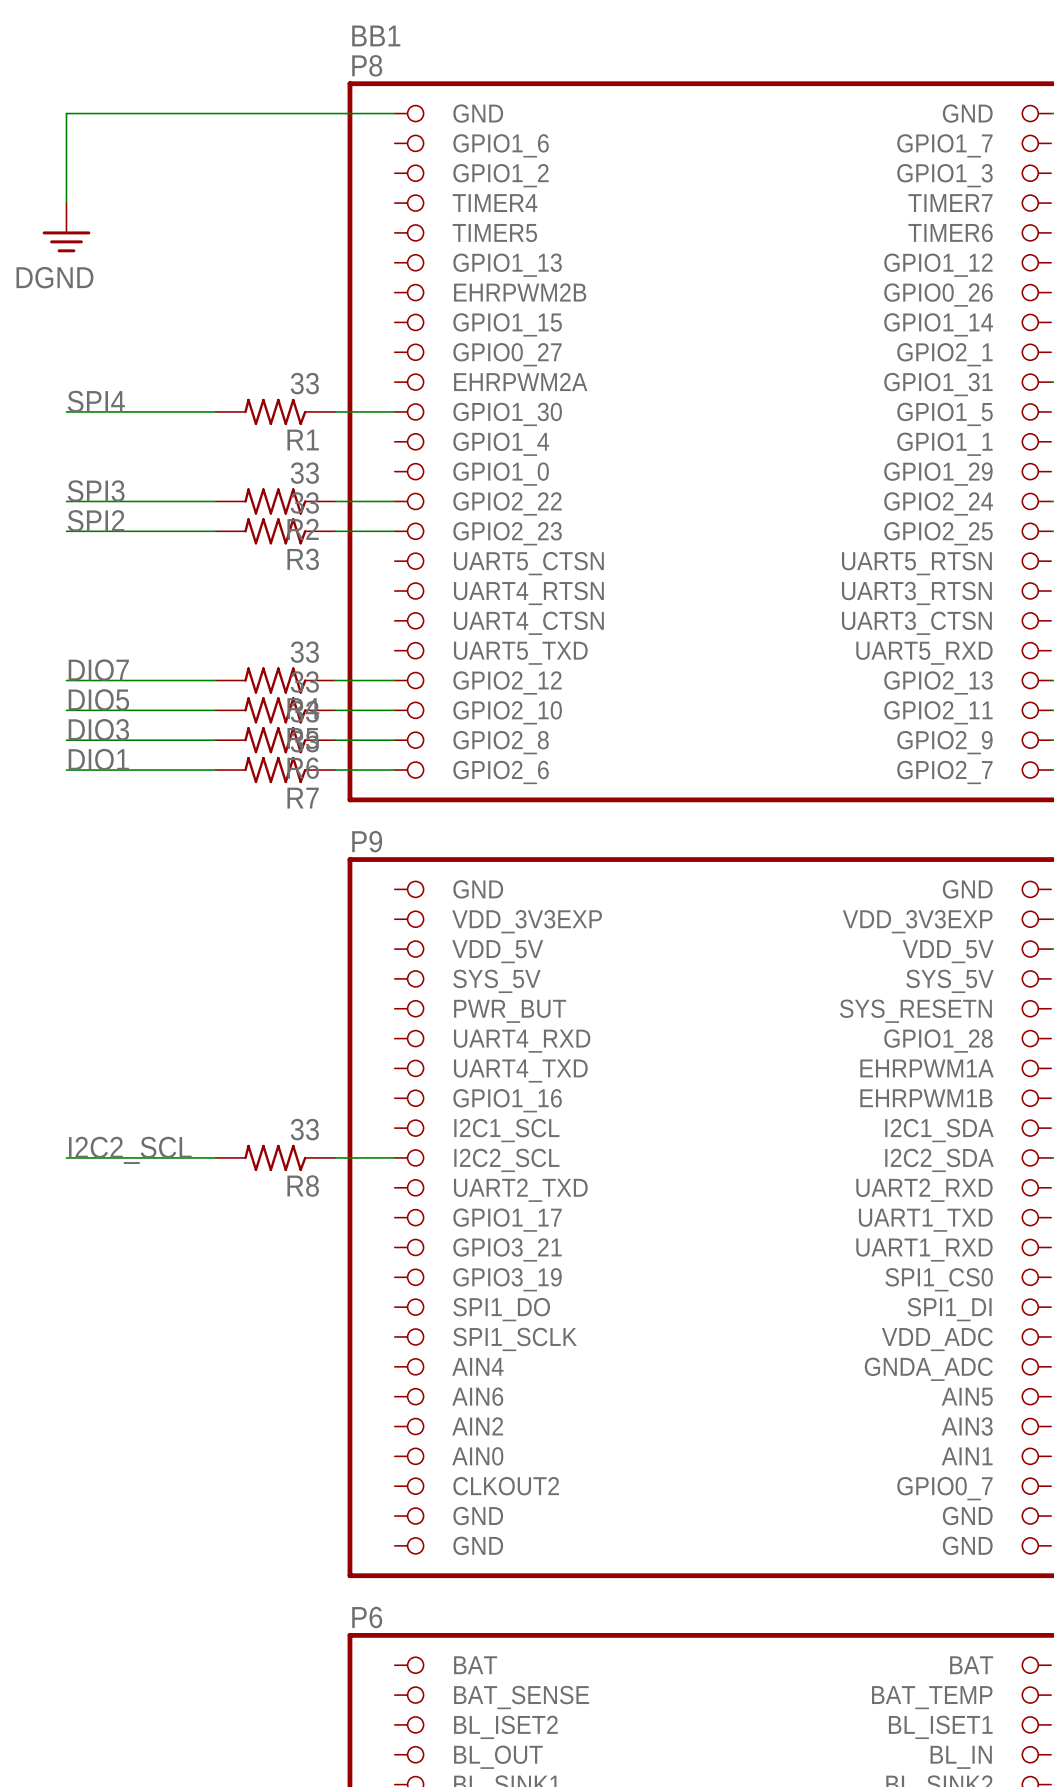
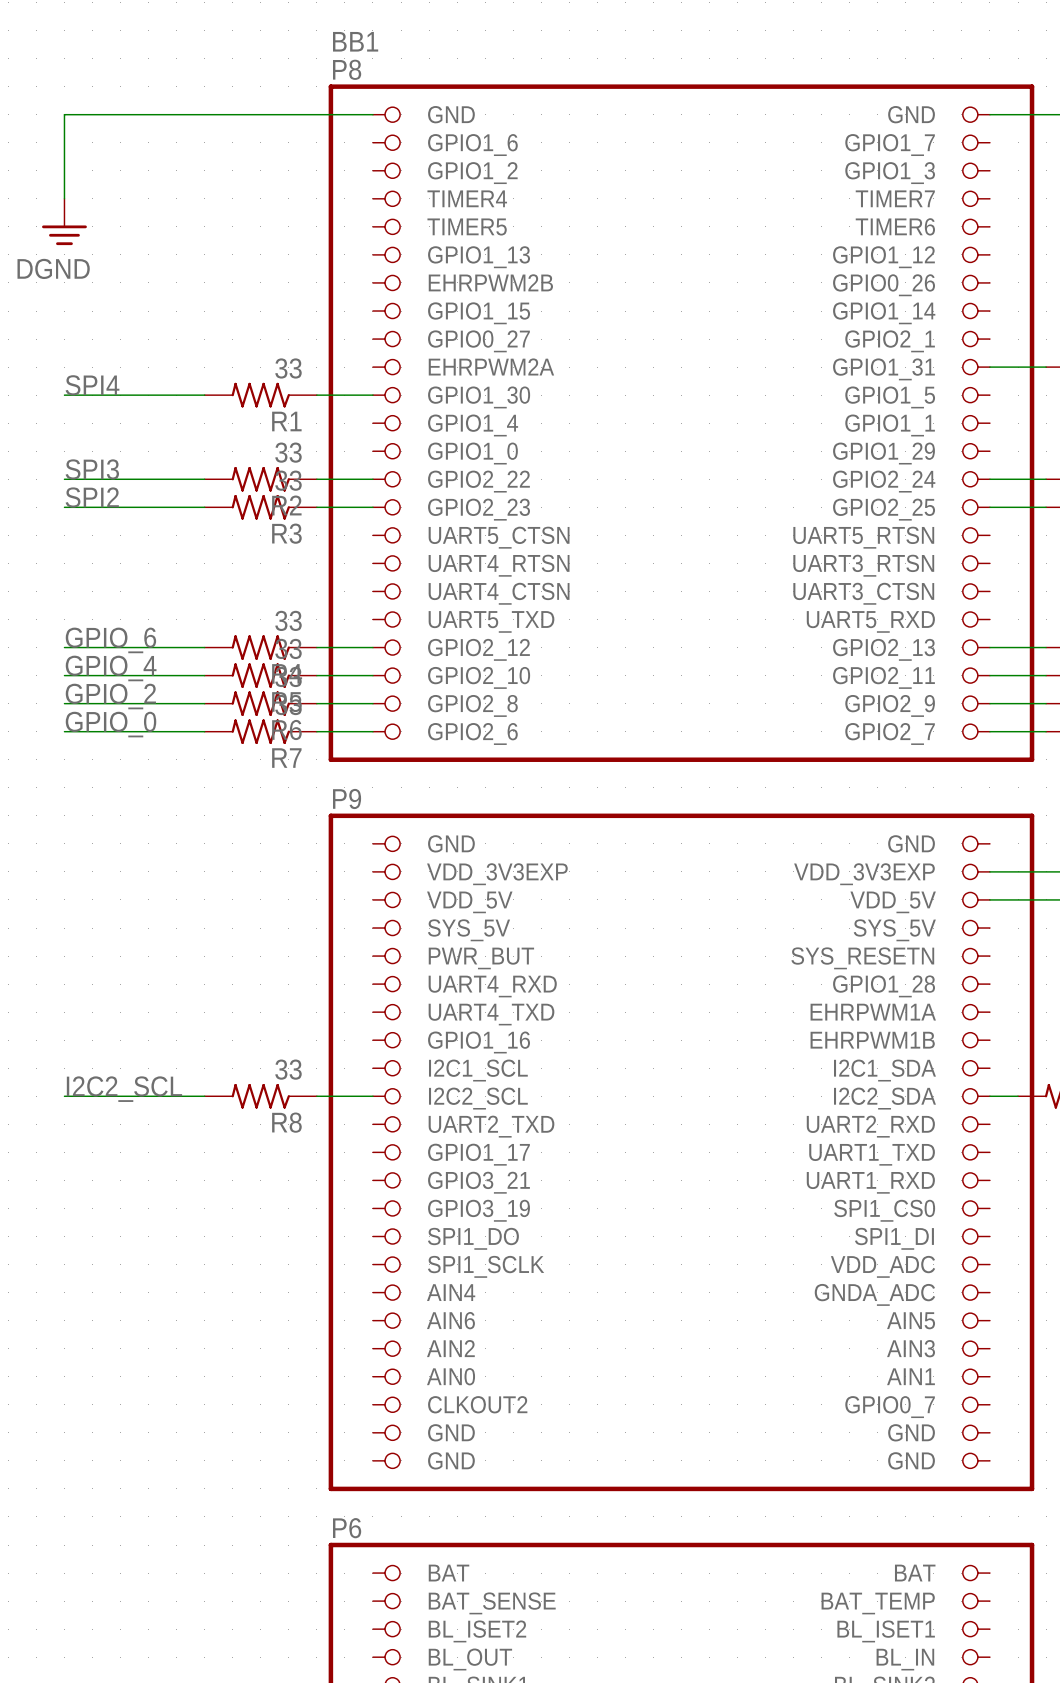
label: DIO7 (98, 670) -> GPIO_6 (110, 640)
label: DIO5 (98, 699) -> GPIO_4 (111, 668)
label: DIO3 (98, 729) -> GPIO_2 (110, 696)
label: DIO1 (98, 759) -> GPIO_0 (111, 724)

